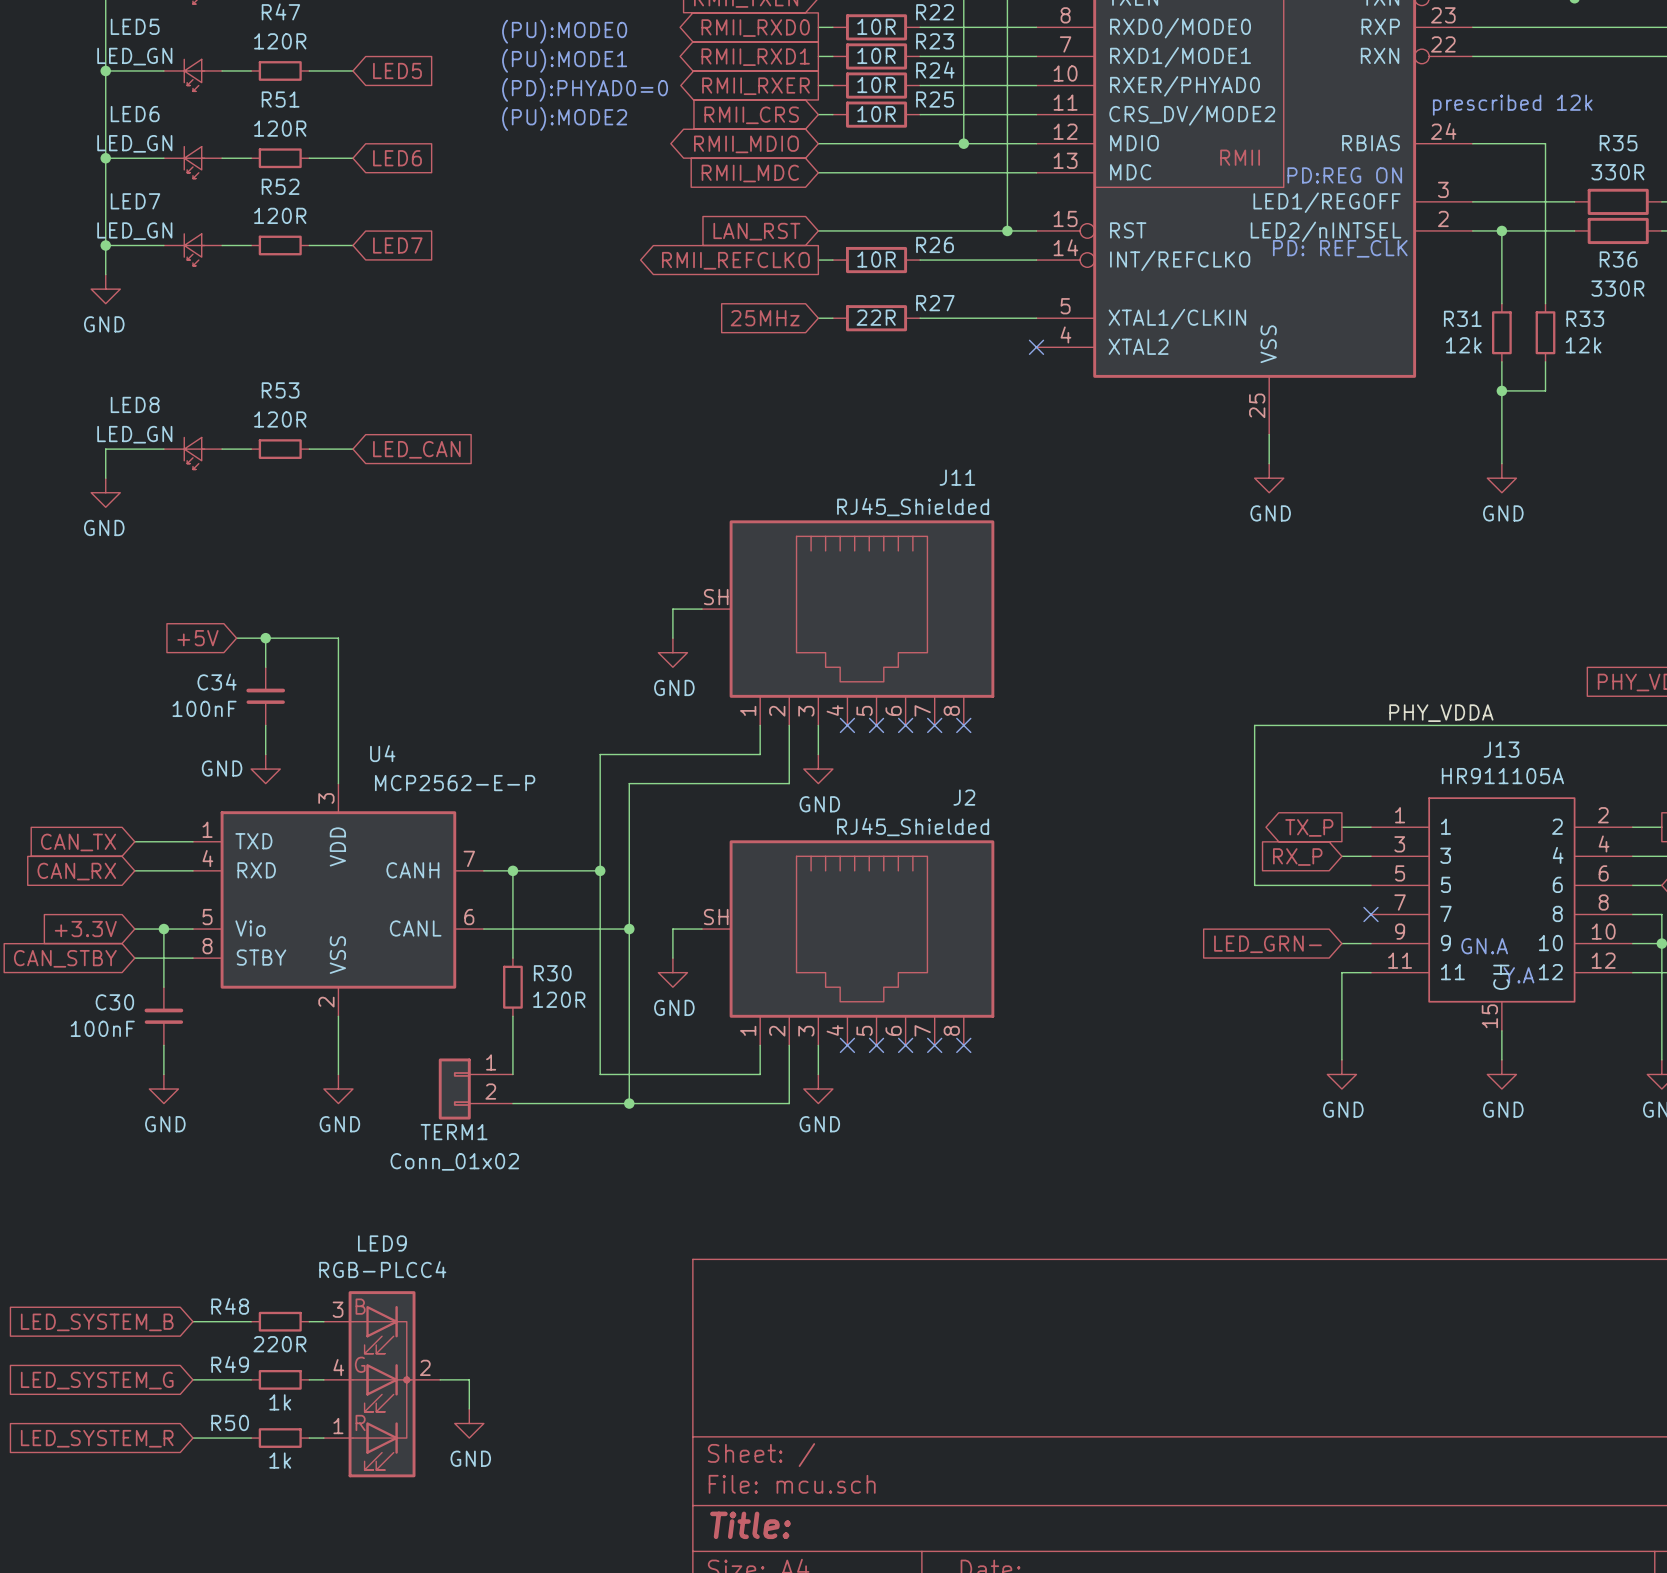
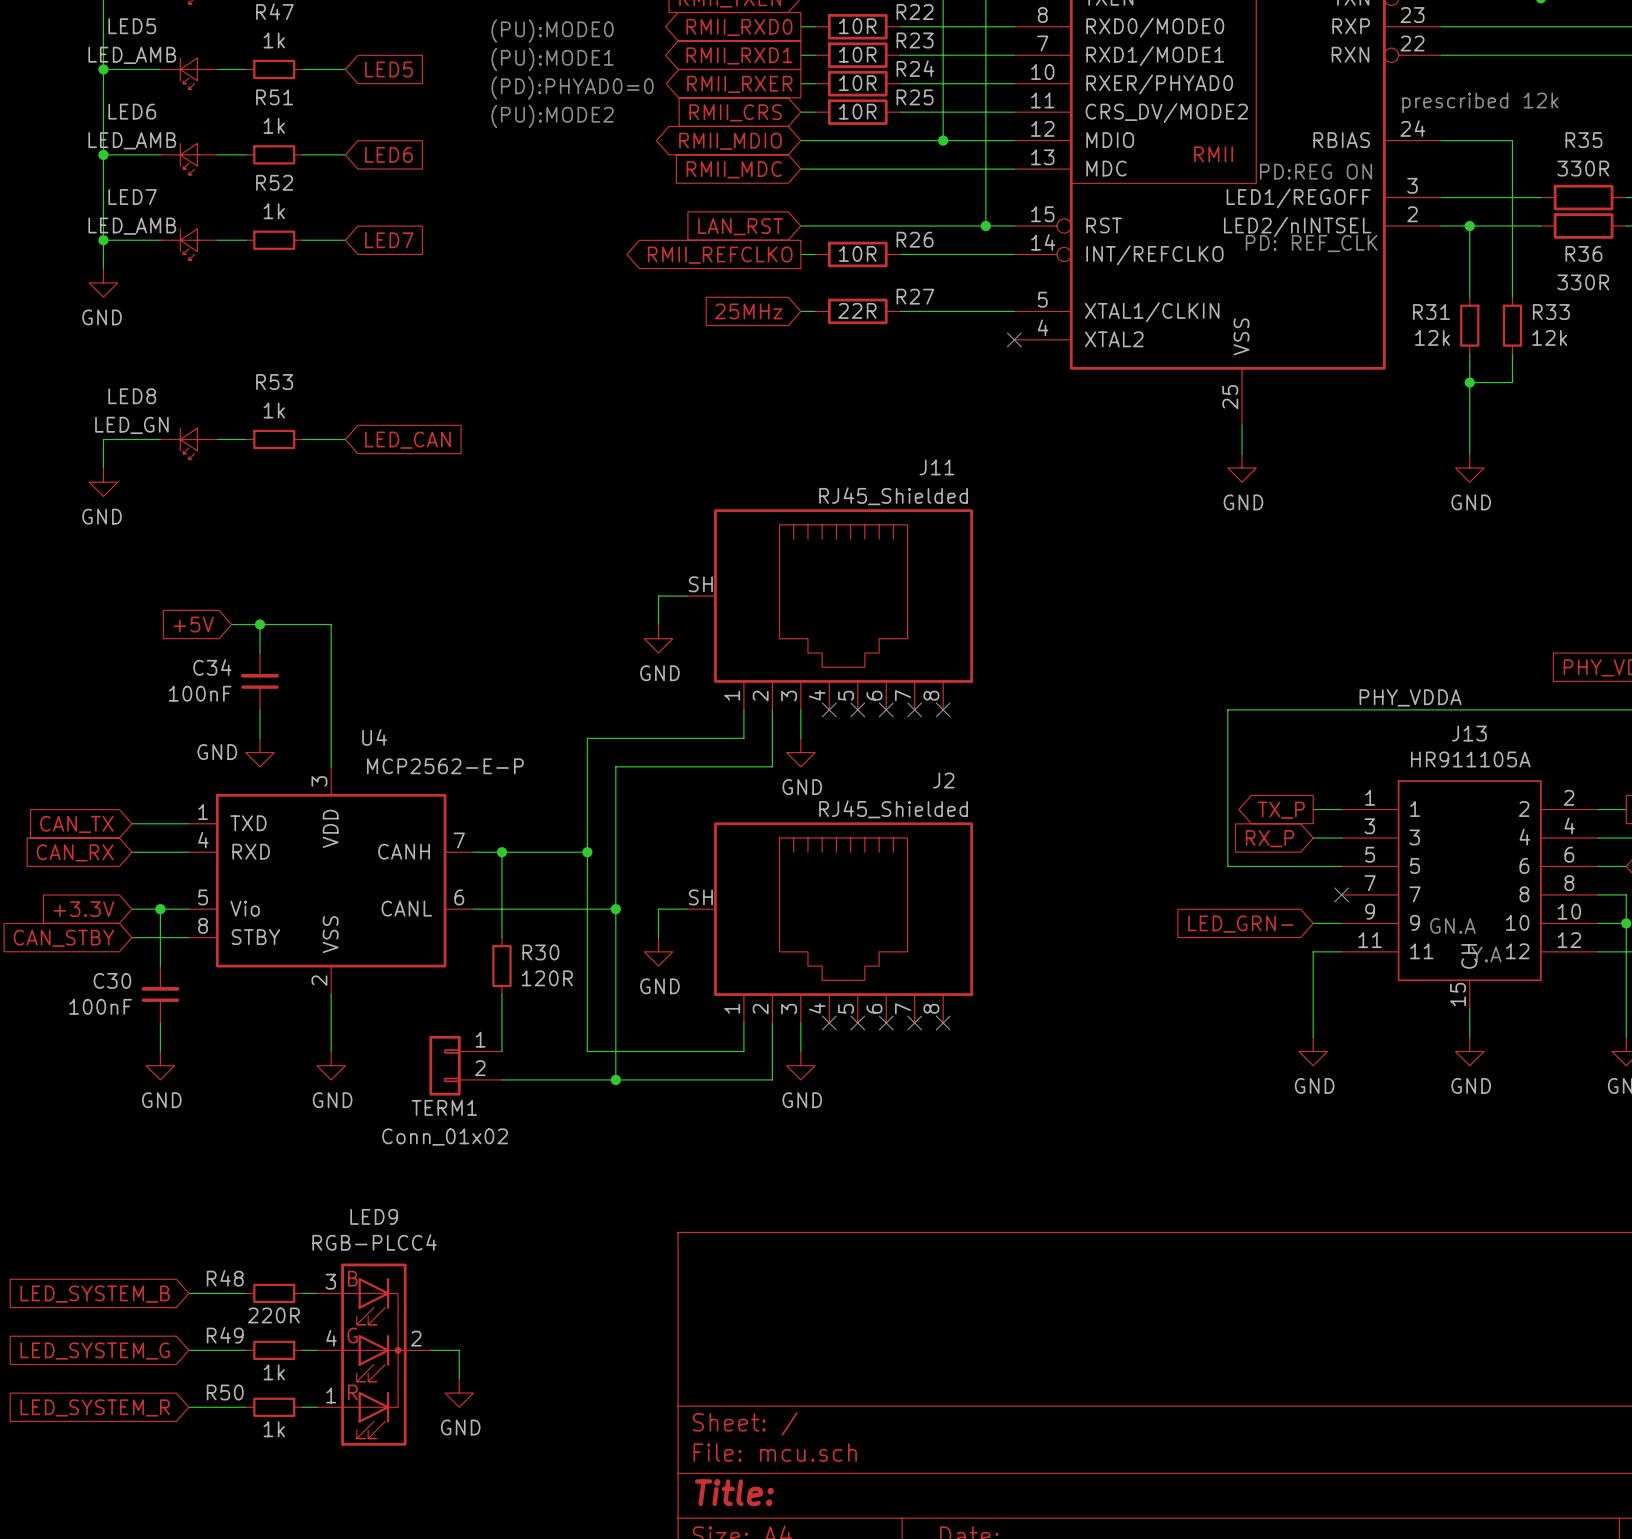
R47 value: 120R (280, 41) -> 1k (274, 40)
LED5 value: LED_GN (134, 56) -> LED_AMB (132, 55)
R51 value: 120R (280, 128) -> 1k (274, 125)
LED6 value: LED_GN (134, 143) -> LED_AMB (132, 140)
R52 value: 120R (280, 215) -> 1k (274, 211)
LED7 value: LED_GN (134, 231) -> LED_AMB (132, 226)
R53 value: 120R (280, 419) -> 1k (274, 410)

